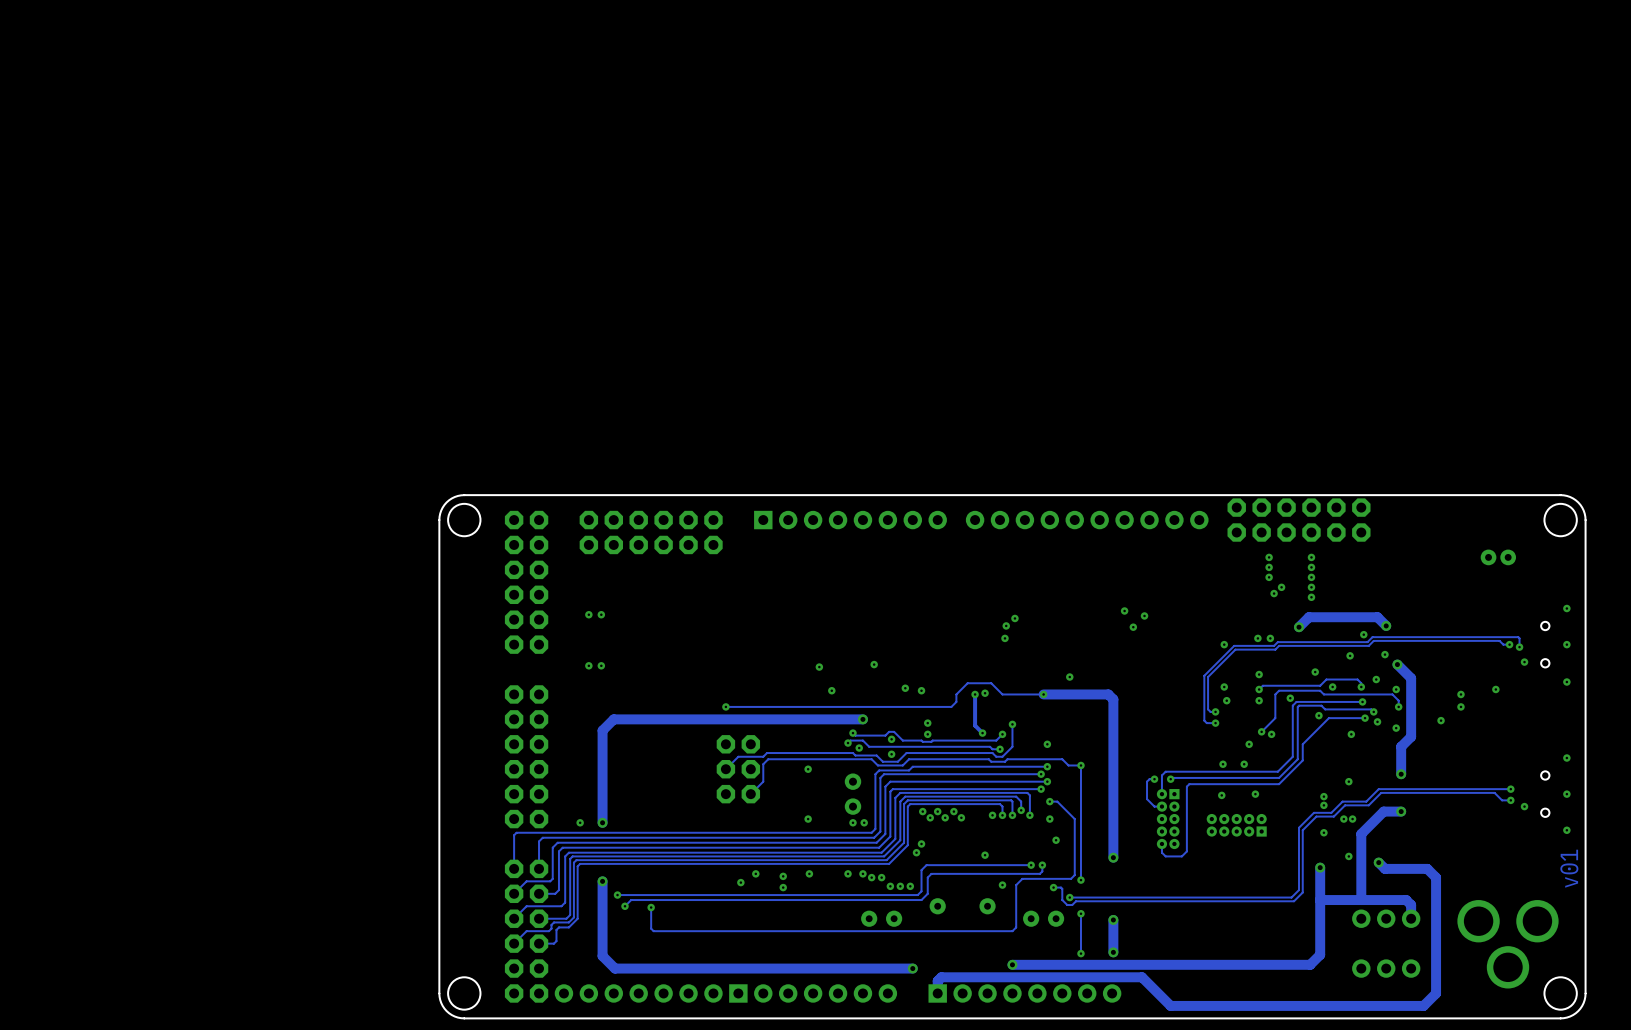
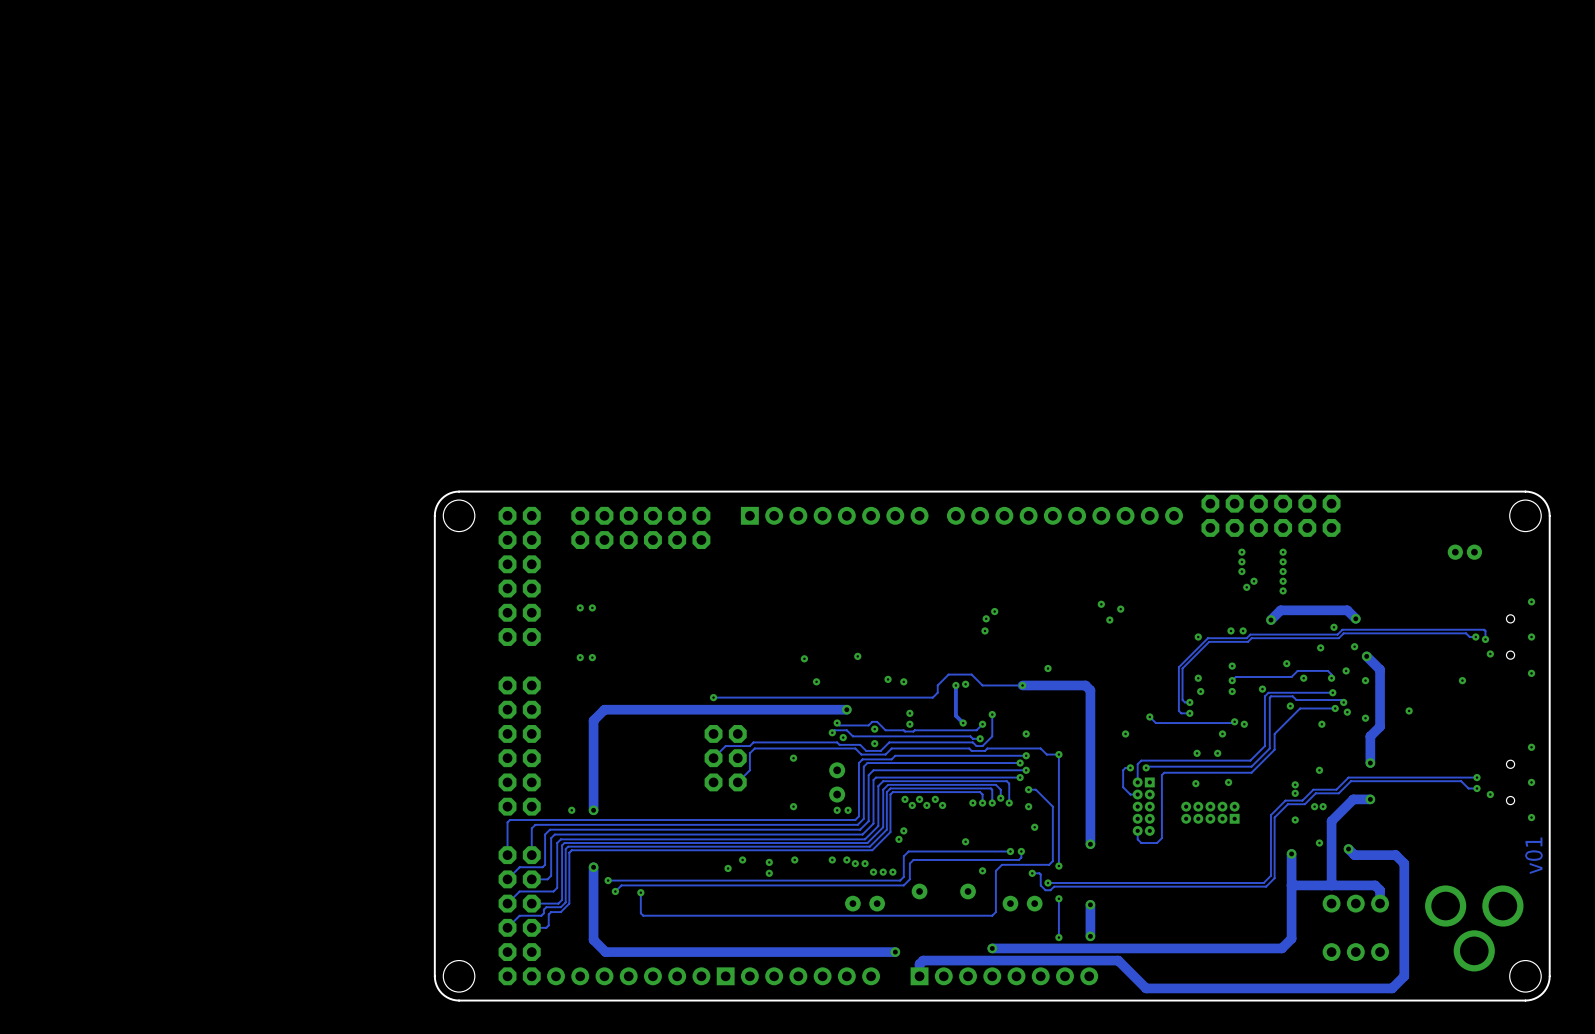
via: (1460, 694) -> none
track: (1398, 706) (1398, 700) (1392, 694) (1323, 694) (1320, 690) (1279, 690) (1275, 694) (1275, 718) (1261, 731) -> none
via: (1398, 706) -> none
via: (1460, 706) -> none
track: none -> (1149, 716) (1155, 723) (1234, 723)
via: none -> (1149, 716)
via: none -> (1125, 733)

